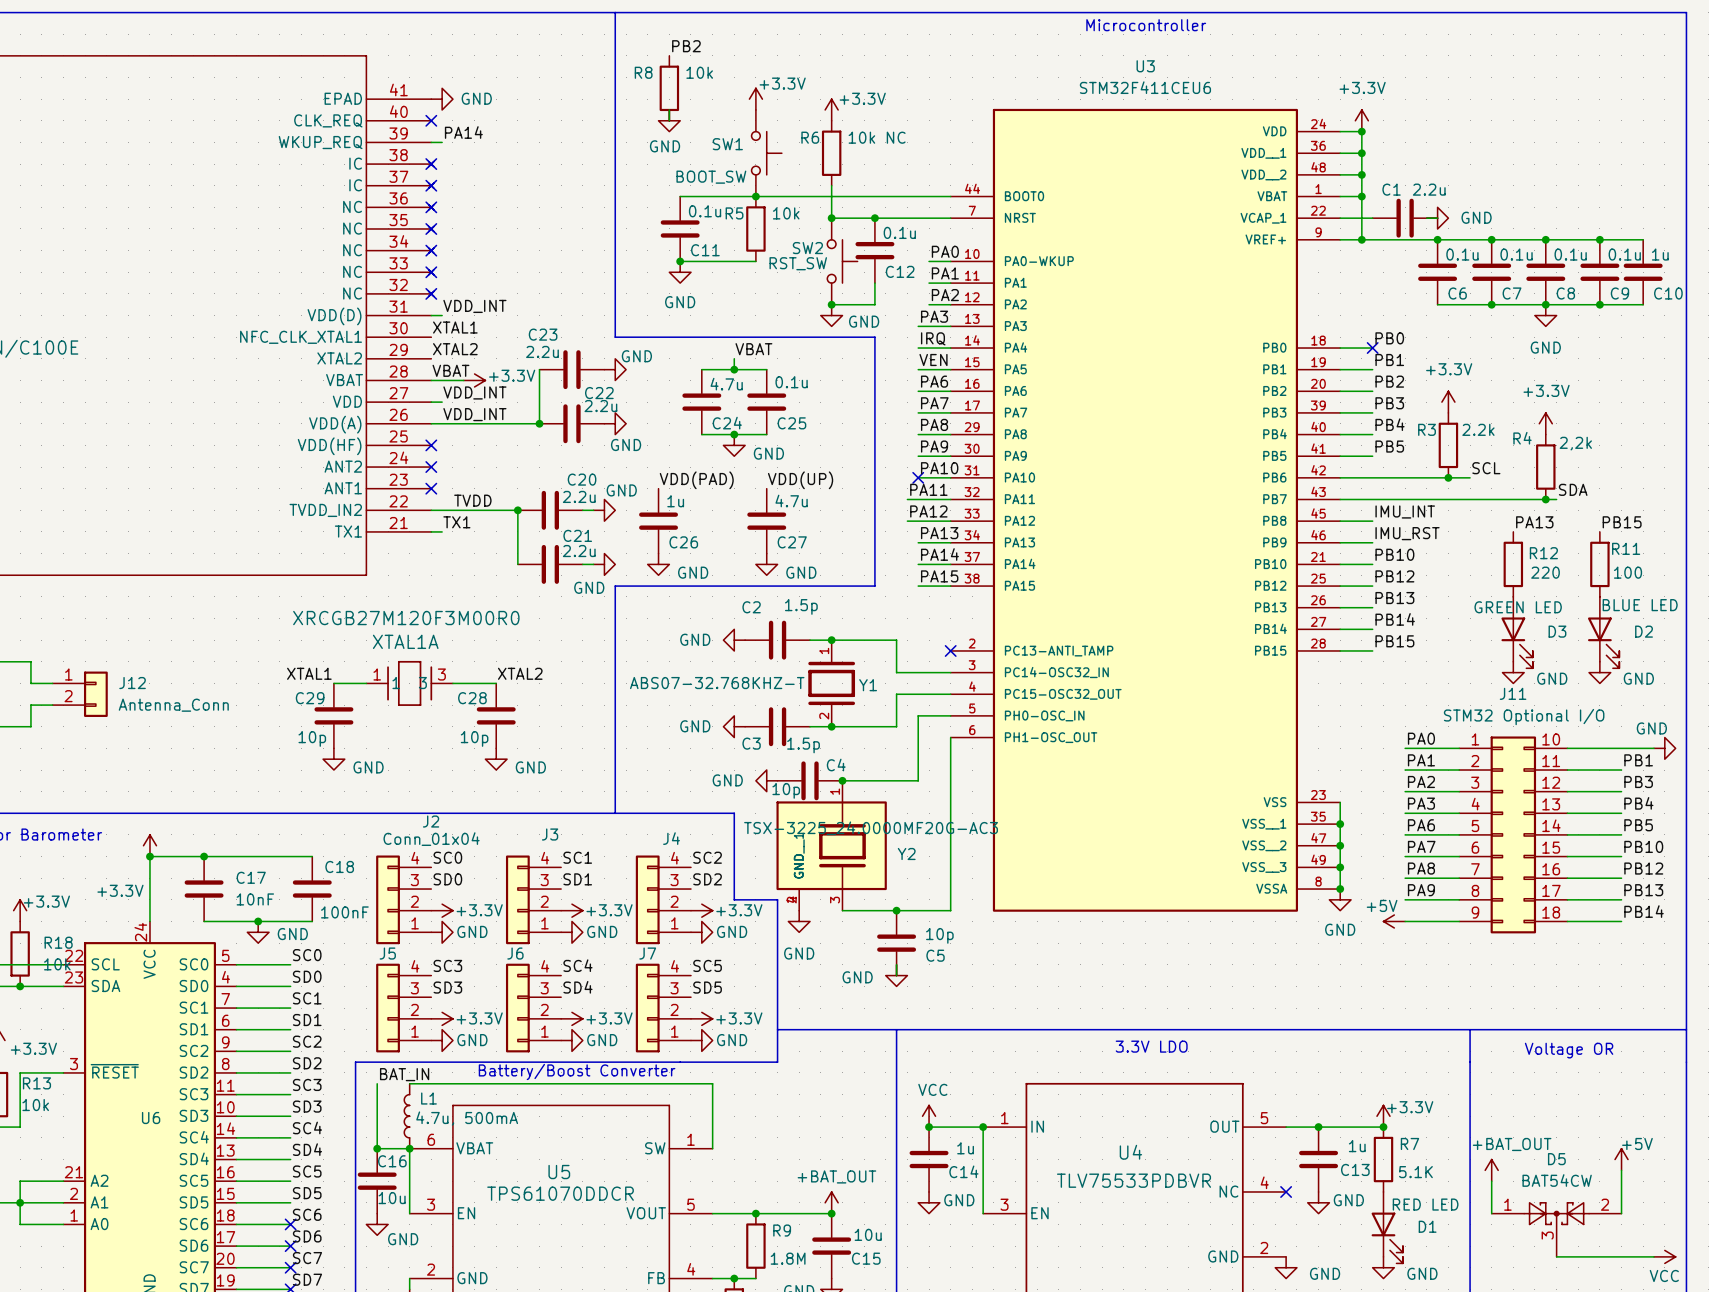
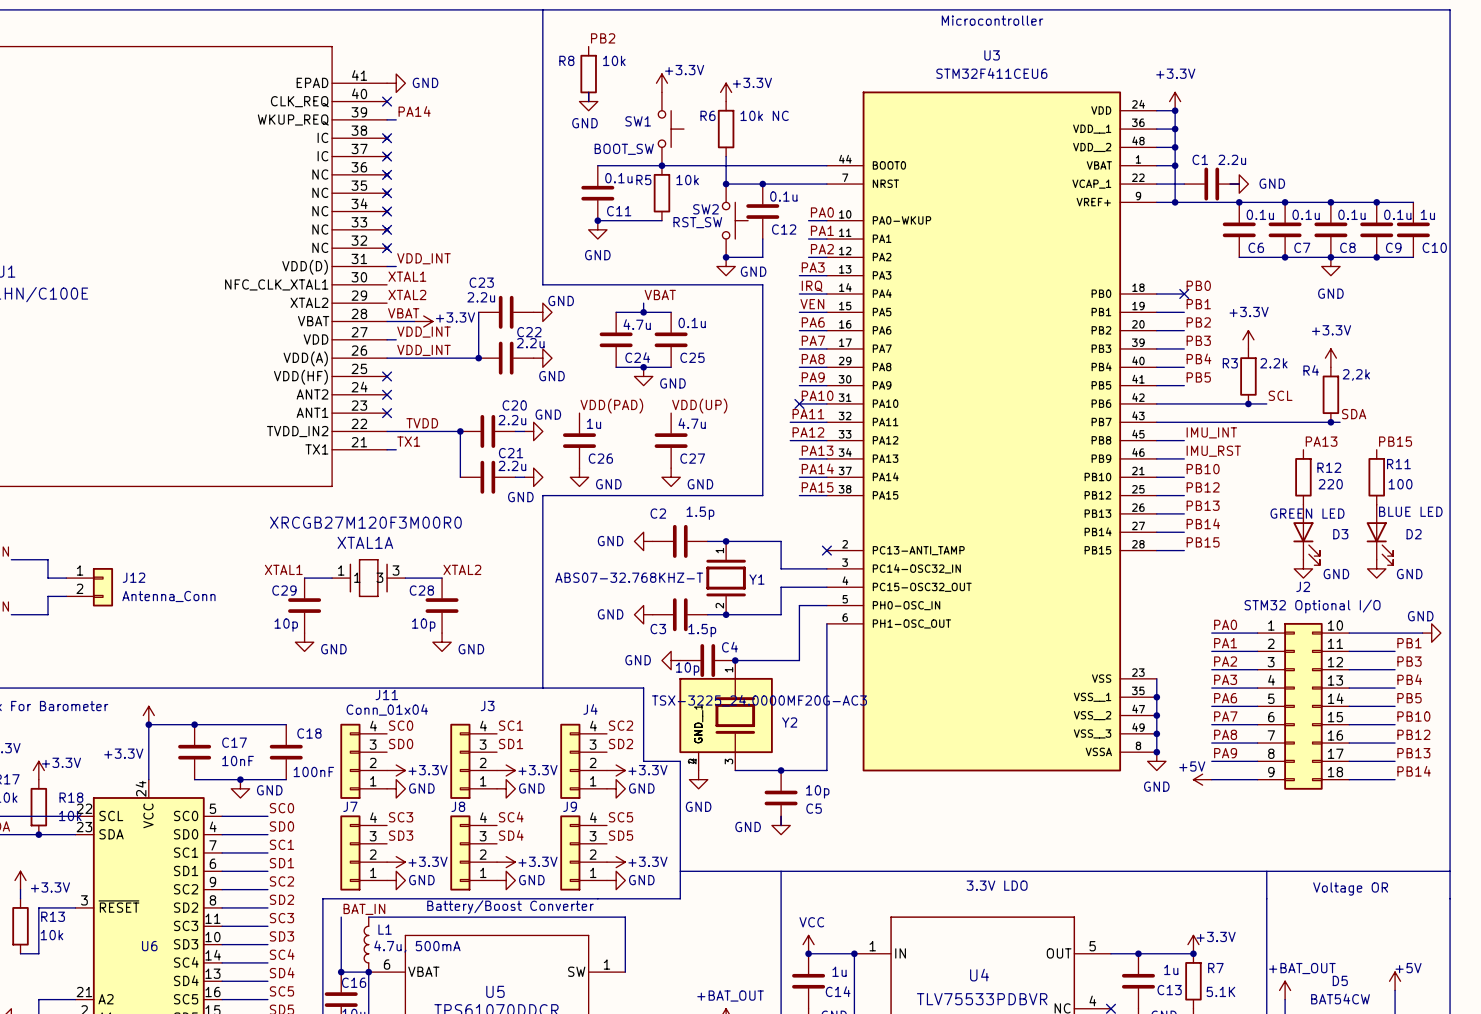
J11 name: J11 (1513, 693) -> J2 (1303, 586)
J2 name: J2 (431, 821) -> J11 (386, 695)
J5 name: J5 (387, 953) -> J7 (350, 806)
J6 name: J6 (515, 953) -> J8 (458, 806)
J7 name: J7 (647, 953) -> J9 (570, 806)

